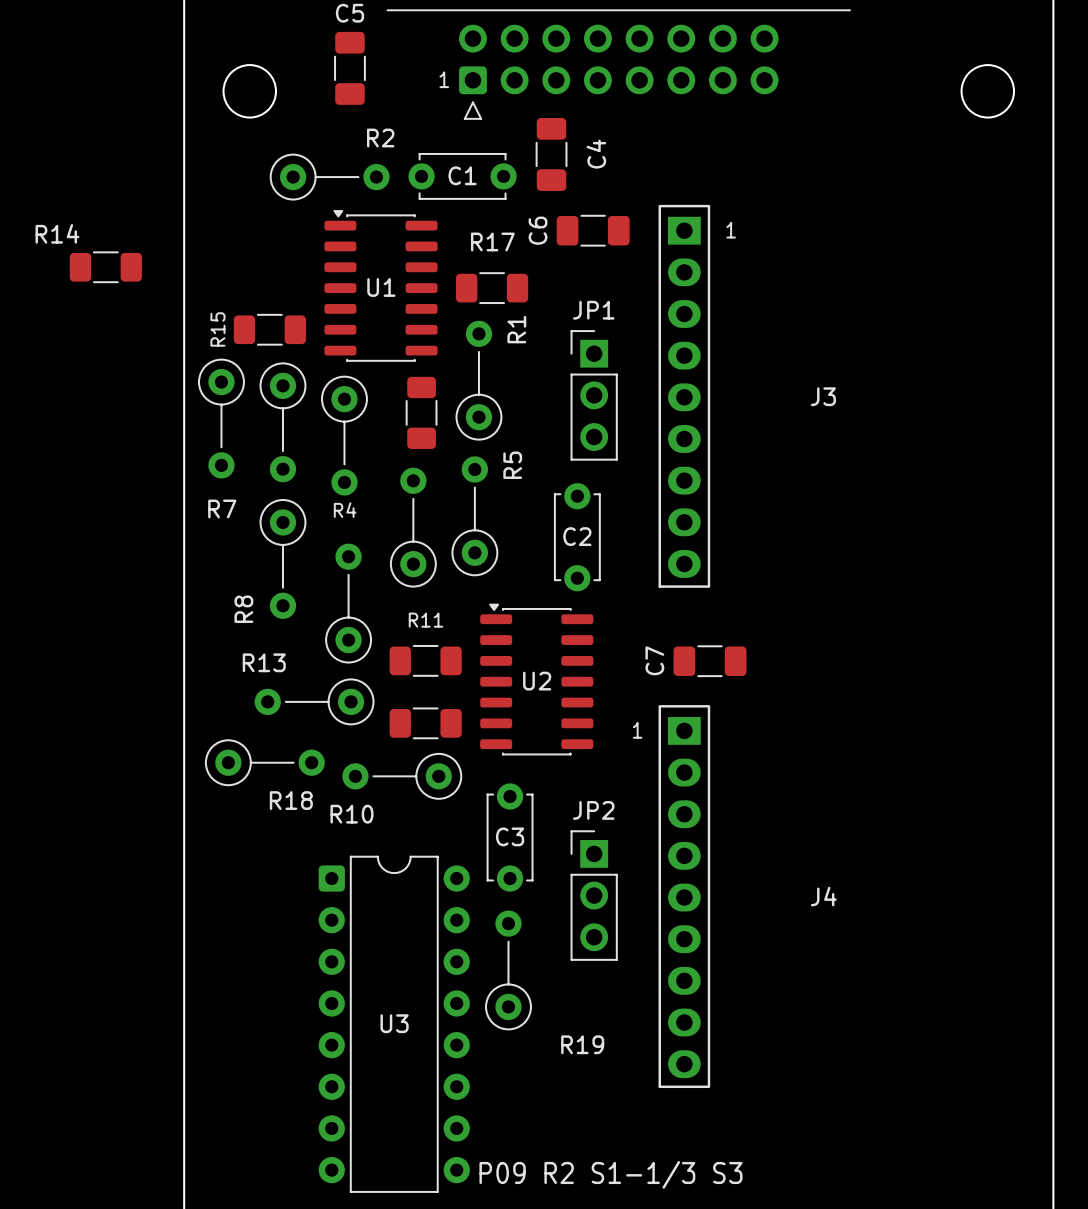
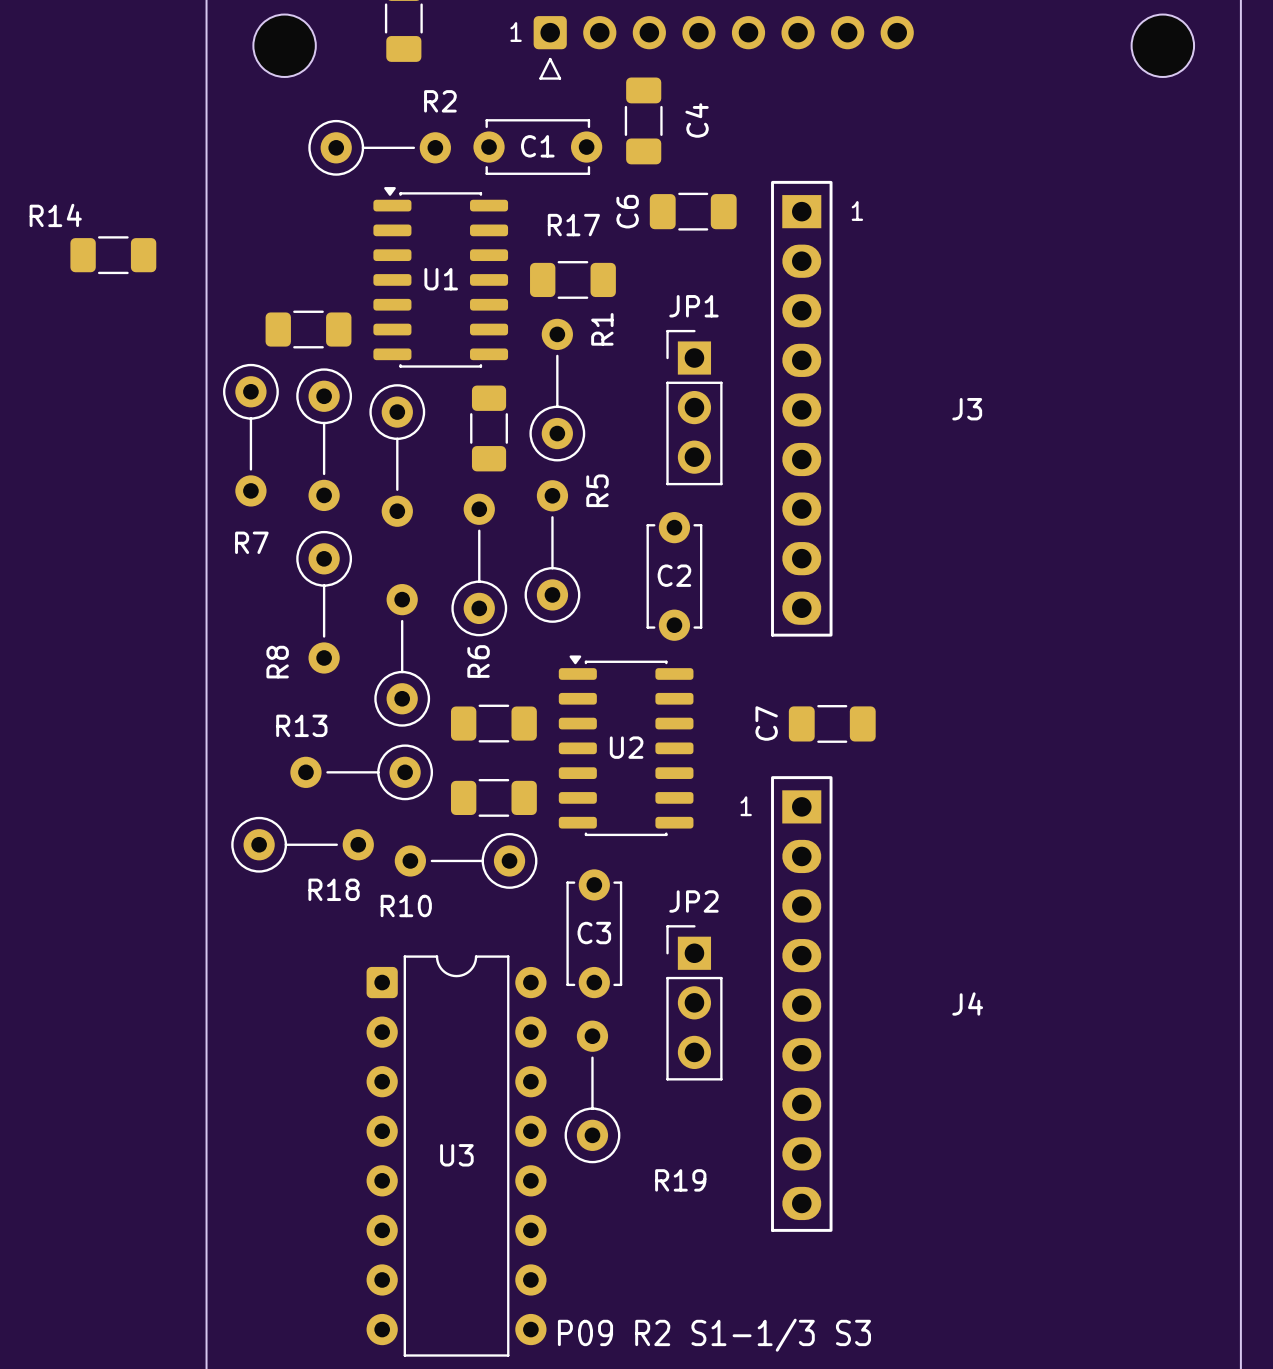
R15 name: R15 (217, 329) -> none
R4 name: R4 (345, 510) -> none
R6 name: none -> R6 (478, 661)
R11 name: R11 (425, 620) -> none

